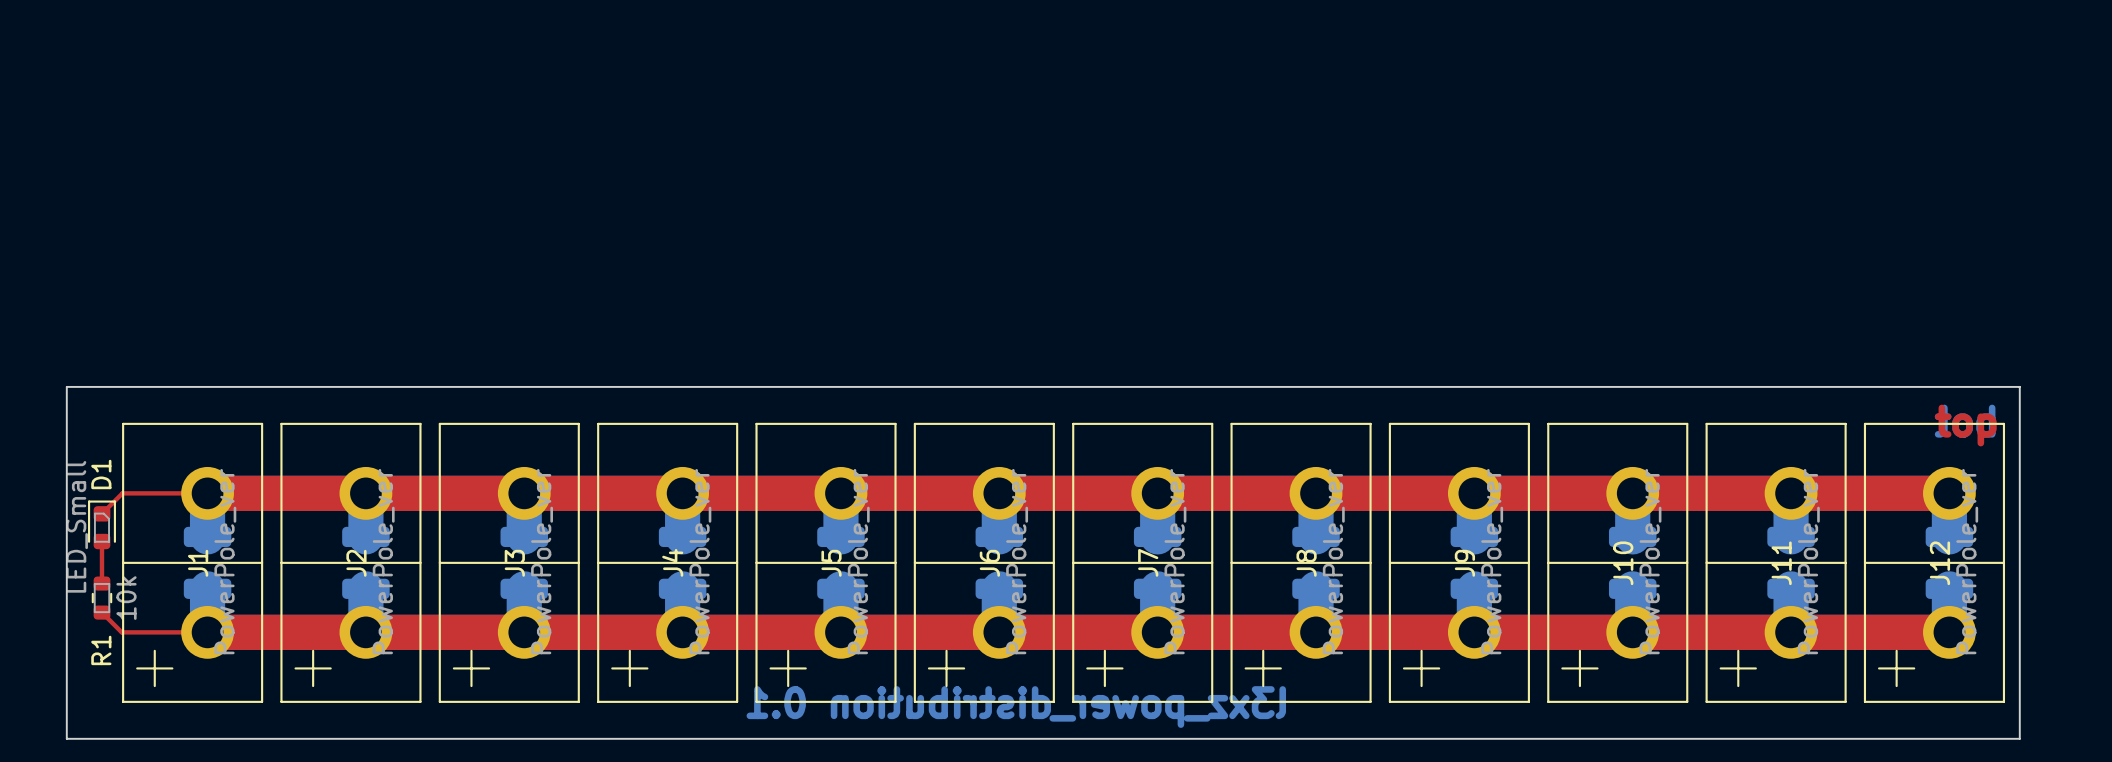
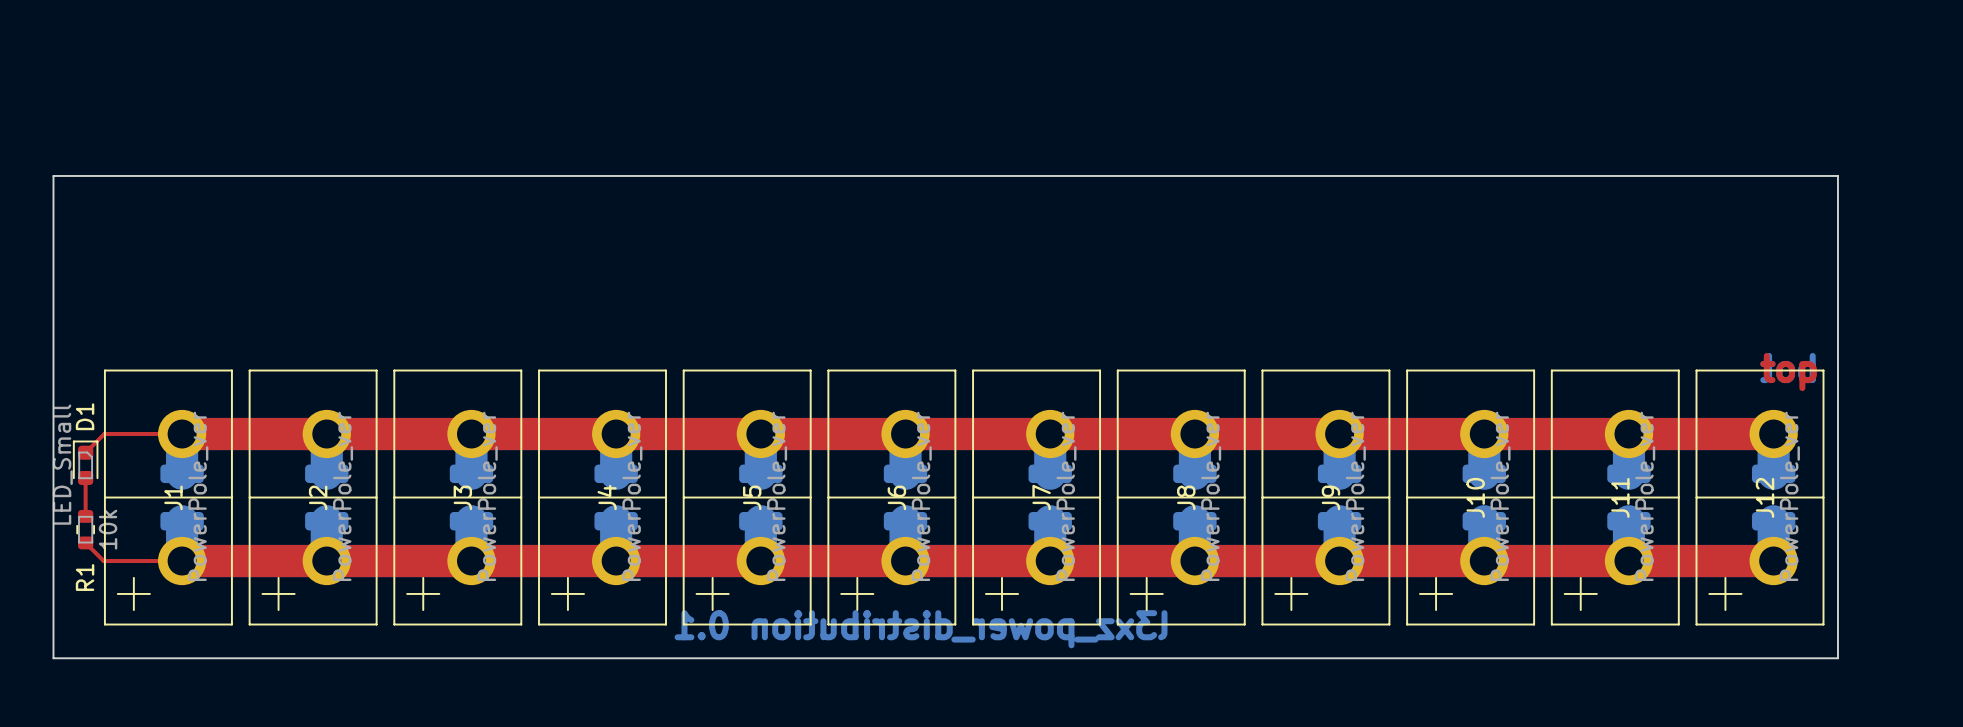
board edge: (66, 386) (2019, 386) -> (53, 336) (53, 175) (1837, 175) (1837, 336)

